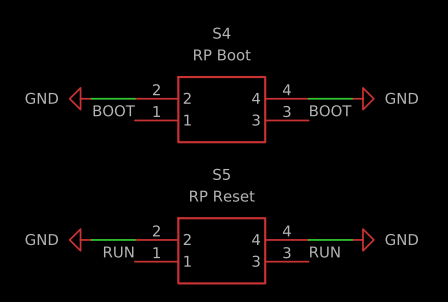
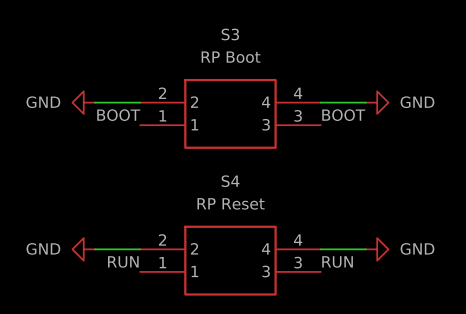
S4 name: S4 (221, 33) -> S3 (230, 34)
S5 name: S5 (221, 174) -> S4 (230, 181)

